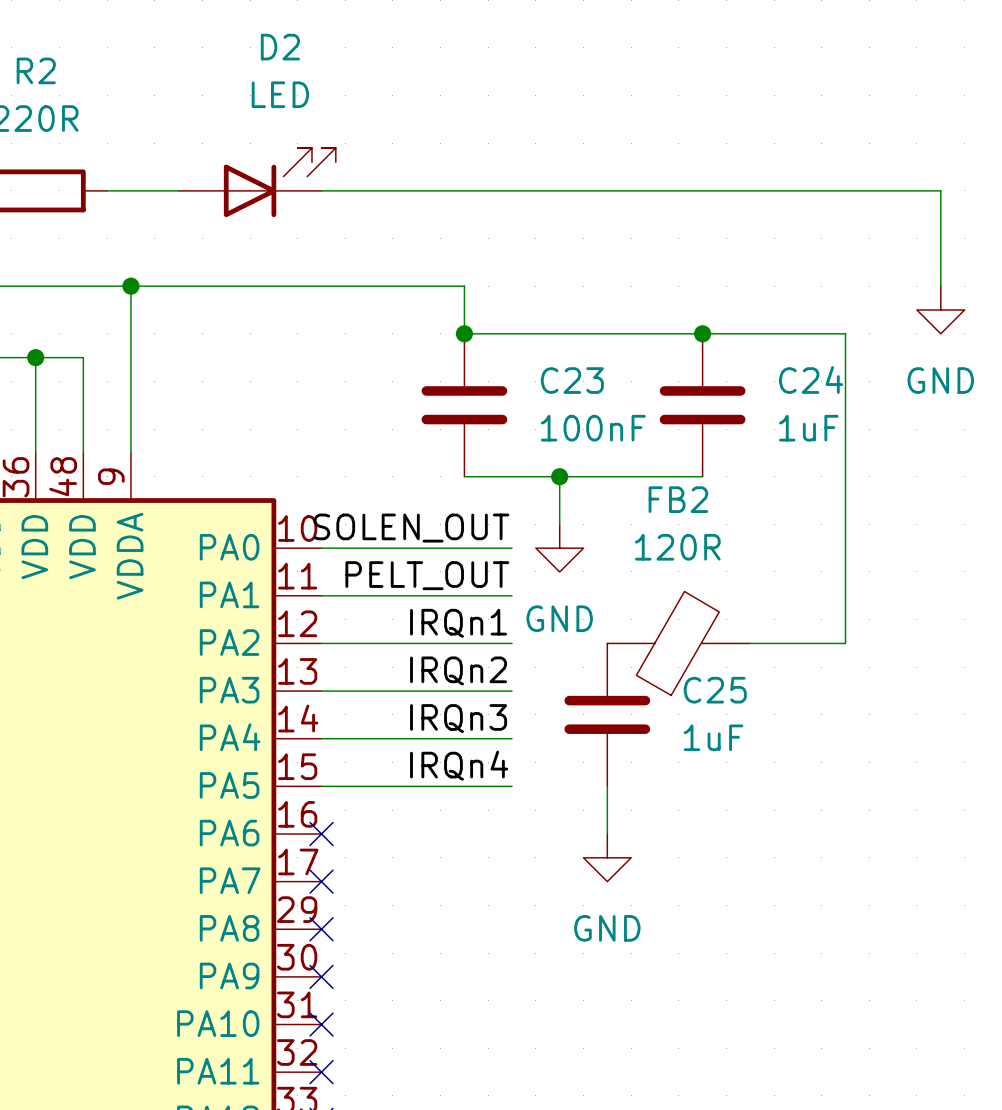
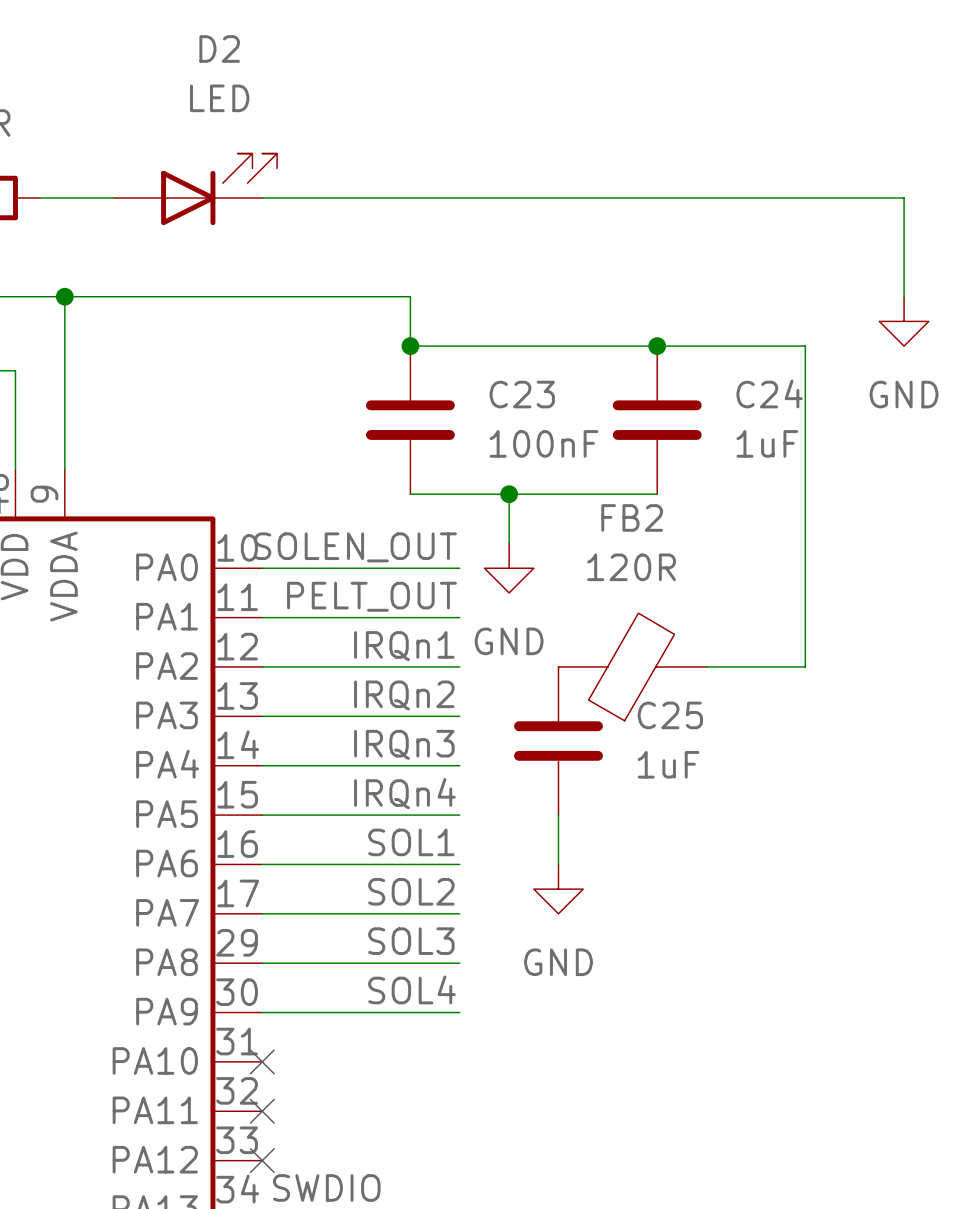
label: none -> SOL1 (411, 842)
wire: none -> (262, 864) (459, 864)
no-connect mark: (321, 833) -> none
label: none -> SOL2 (411, 891)
wire: none -> (262, 913) (459, 913)
no-connect mark: (321, 881) -> none
label: none -> SOL3 (411, 941)
wire: none -> (262, 963) (459, 963)
no-connect mark: (321, 929) -> none
label: none -> SOL4 (411, 989)
wire: none -> (262, 1012) (459, 1012)
no-connect mark: (321, 976) -> none

